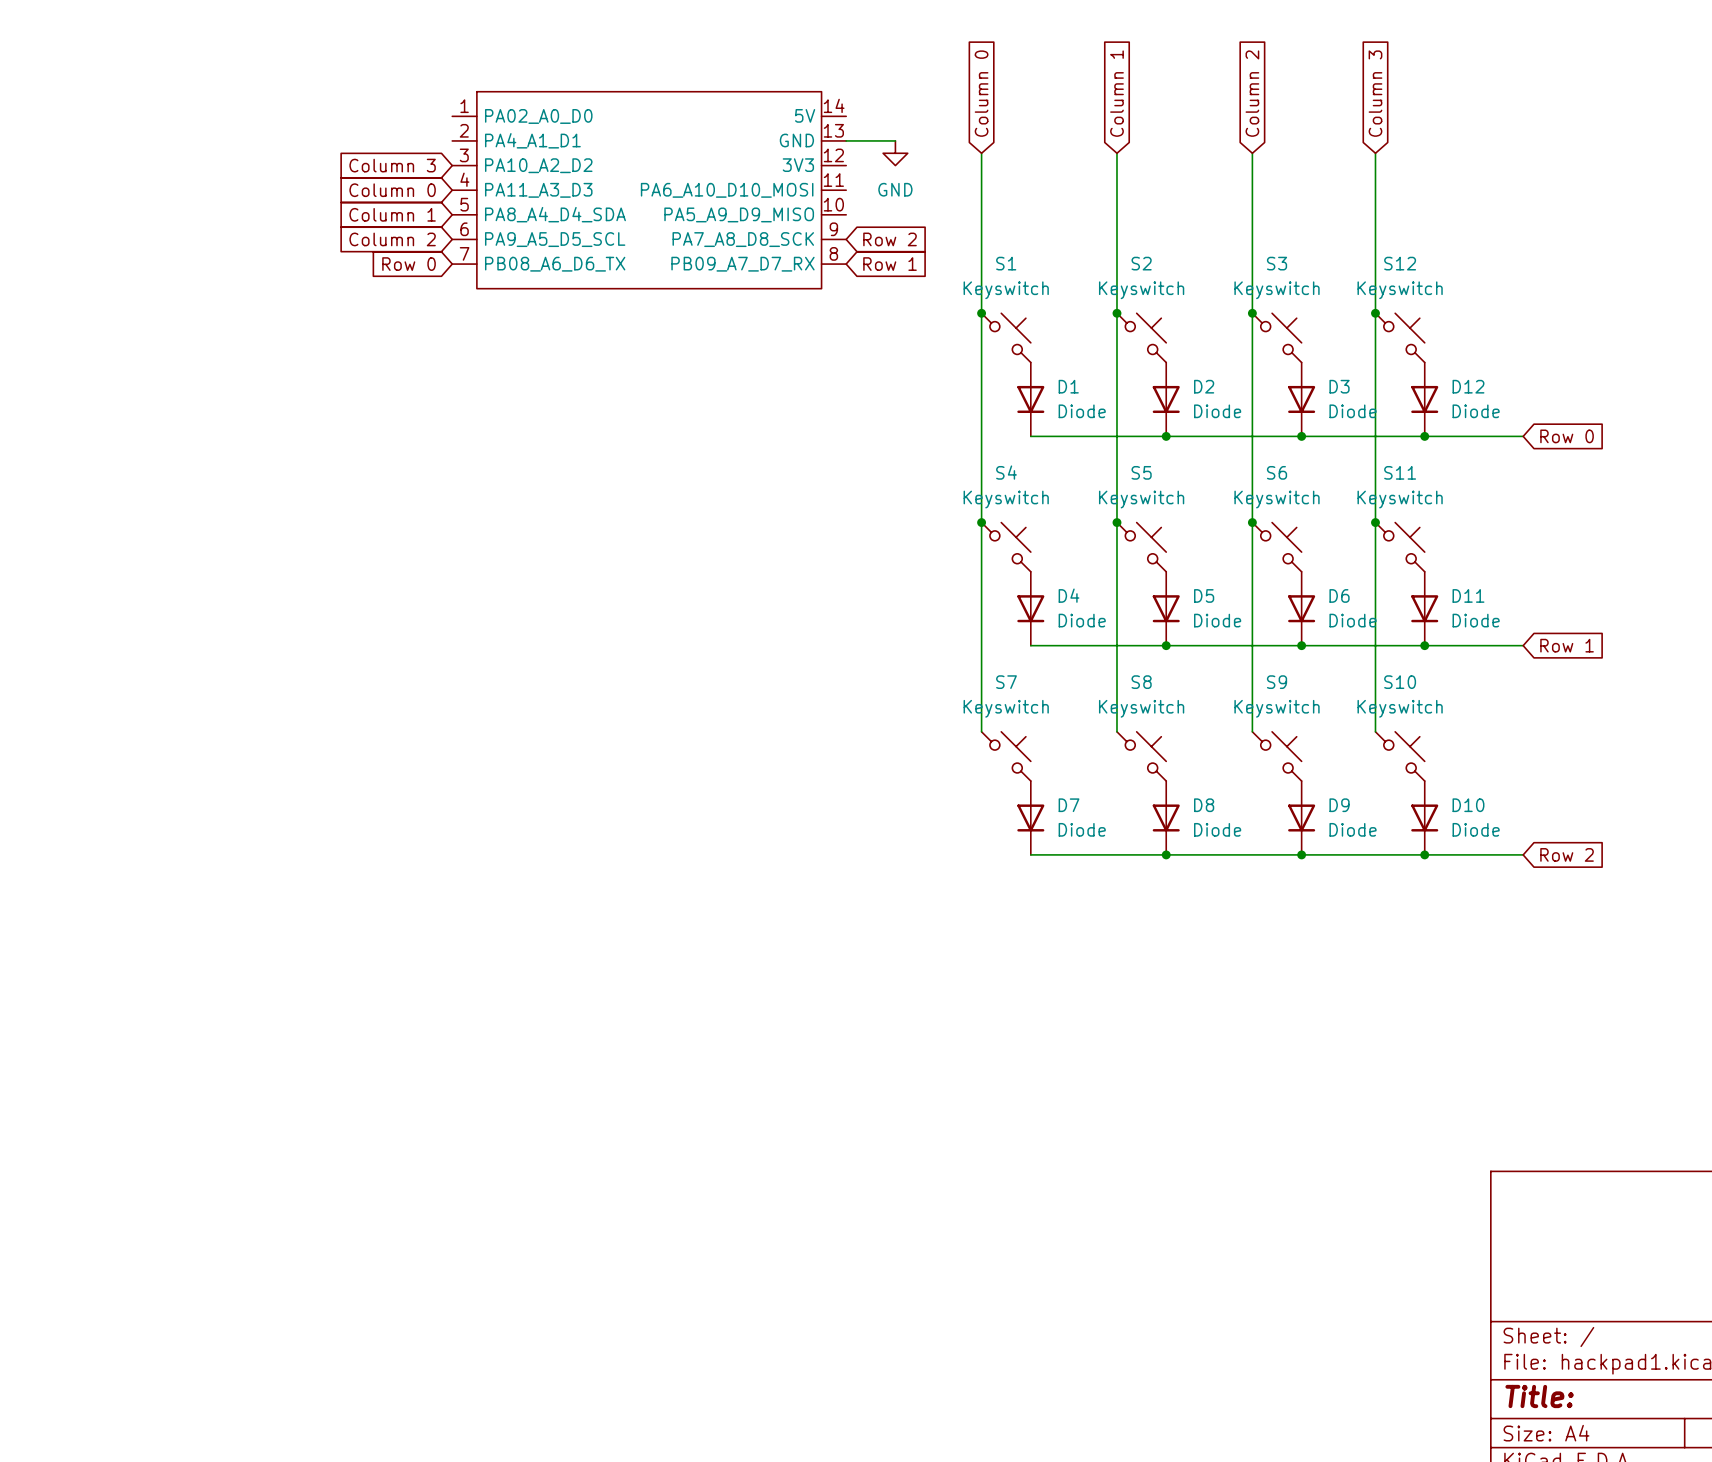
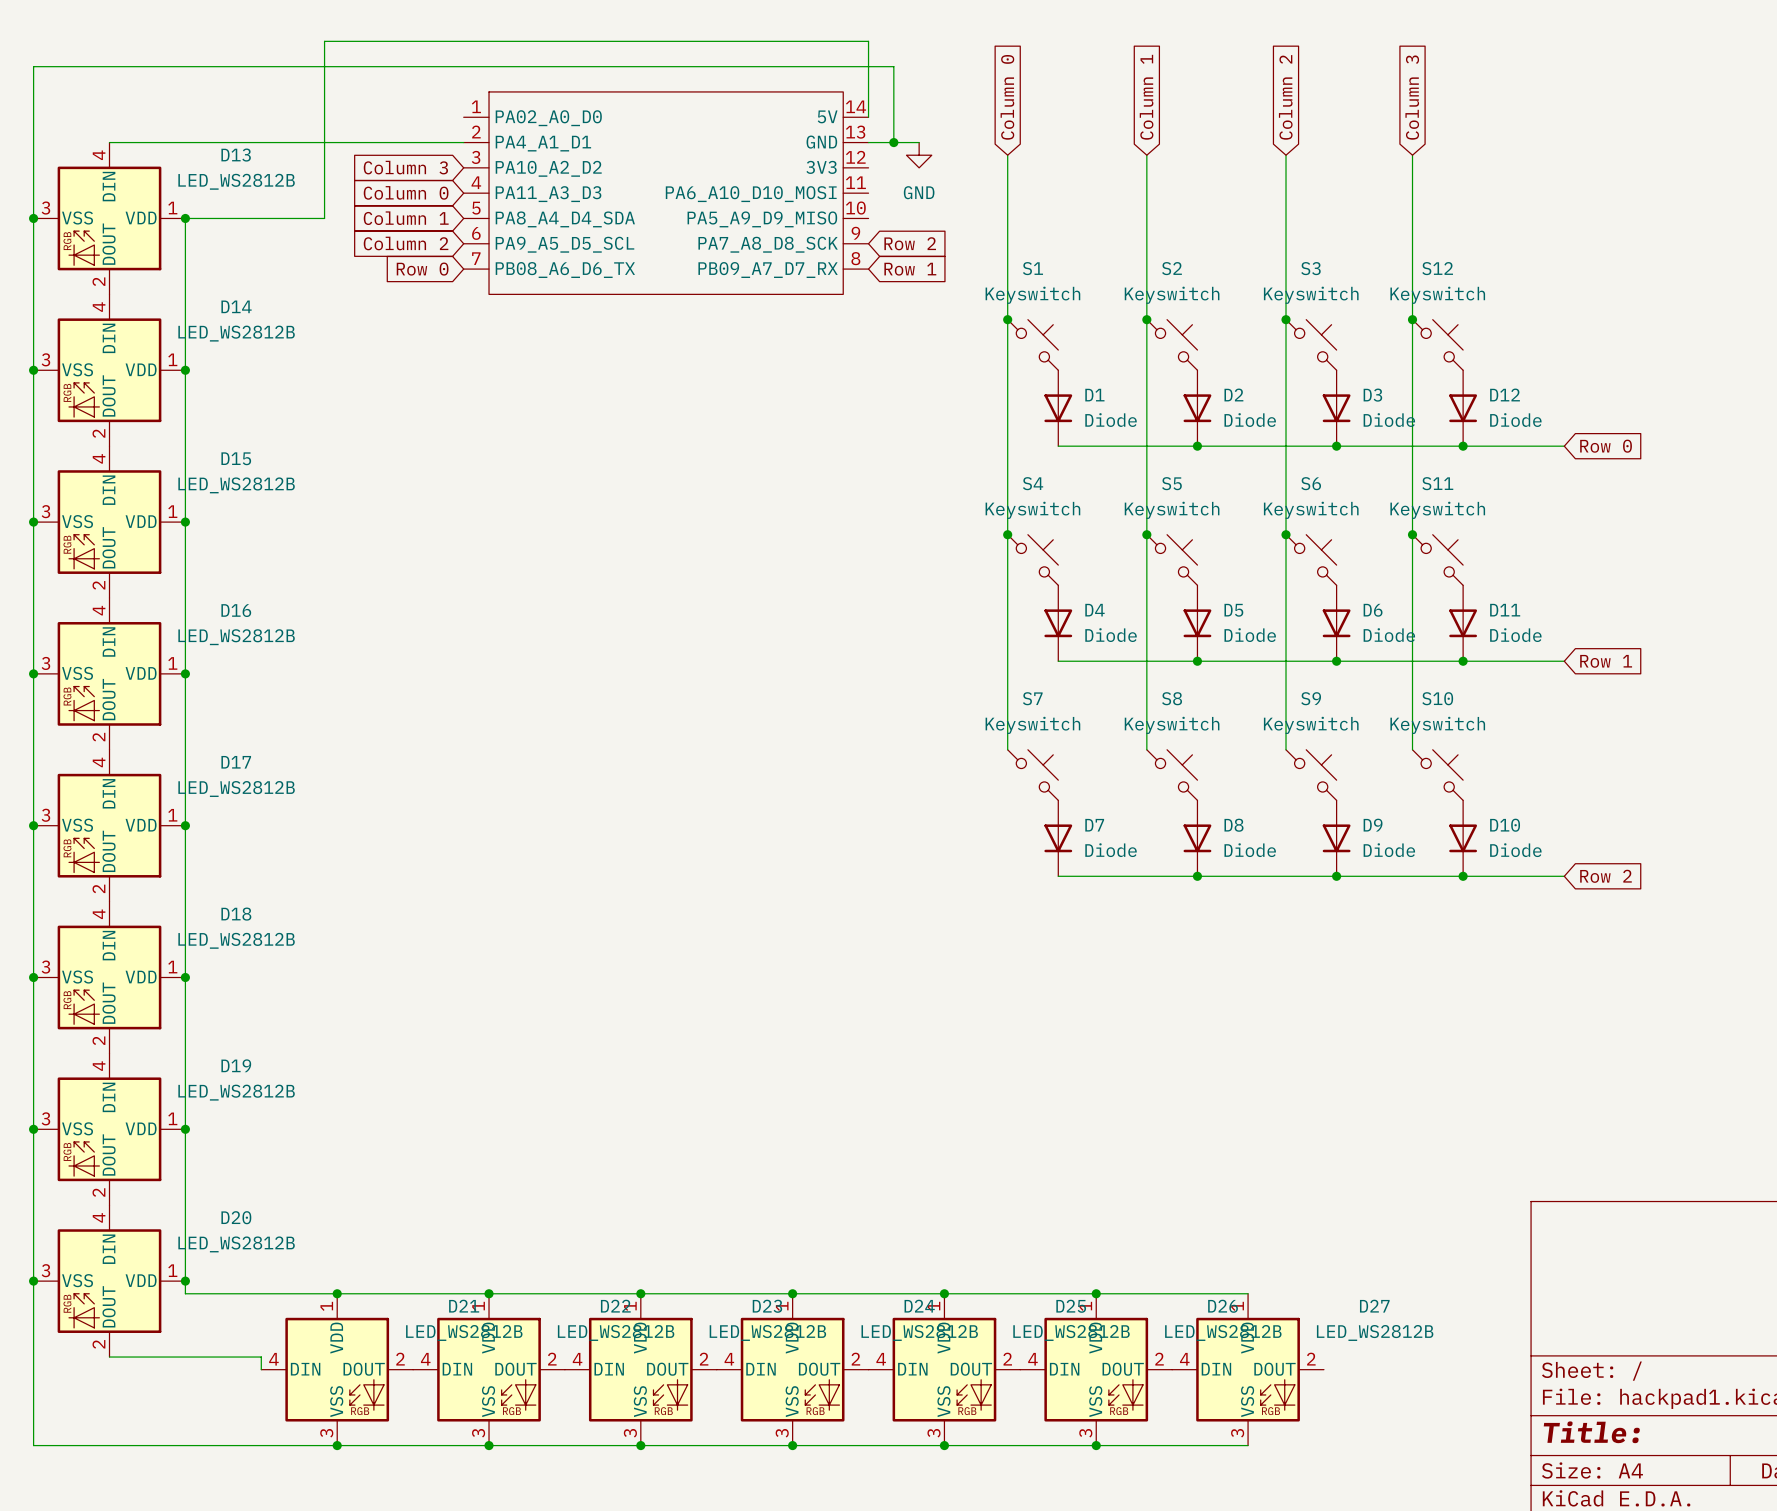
wire: none -> (868, 117) (868, 41) (324, 41) (324, 218) (185, 218) (185, 1293) (1248, 1293)
wire: none -> (109, 142) (463, 142)
wire: none -> (893, 142) (893, 66) (33, 66) (33, 1445) (1248, 1445)
junction: none -> (893, 142)
junction: none -> (33, 218)
D13: none -> LED_WS2812B (109, 218)
junction: none -> (185, 218)
junction: none -> (33, 370)
D14: none -> LED_WS2812B (109, 370)
junction: none -> (185, 370)
junction: none -> (33, 522)
D15: none -> LED_WS2812B (109, 522)
junction: none -> (185, 522)
junction: none -> (33, 673)
D16: none -> LED_WS2812B (109, 673)
junction: none -> (185, 673)
junction: none -> (33, 825)
D17: none -> LED_WS2812B (109, 825)
junction: none -> (185, 825)
junction: none -> (33, 977)
D18: none -> LED_WS2812B (109, 977)
junction: none -> (185, 977)
junction: none -> (33, 1129)
D19: none -> LED_WS2812B (109, 1129)
junction: none -> (185, 1129)
junction: none -> (33, 1281)
D20: none -> LED_WS2812B (109, 1281)
junction: none -> (185, 1281)
junction: none -> (337, 1293)
junction: none -> (489, 1293)
junction: none -> (640, 1293)
junction: none -> (792, 1293)
junction: none -> (944, 1293)
junction: none -> (1096, 1293)
wire: none -> (109, 1357) (261, 1357) (261, 1369)
D21: none -> LED_WS2812B (337, 1369)
D22: none -> LED_WS2812B (489, 1369)
D23: none -> LED_WS2812B (640, 1369)
D24: none -> LED_WS2812B (792, 1369)
D25: none -> LED_WS2812B (944, 1369)
D26: none -> LED_WS2812B (1096, 1369)
D27: none -> LED_WS2812B (1248, 1369)
junction: none -> (337, 1445)
junction: none -> (489, 1445)
junction: none -> (640, 1445)
junction: none -> (792, 1445)
junction: none -> (944, 1445)
junction: none -> (1096, 1445)

